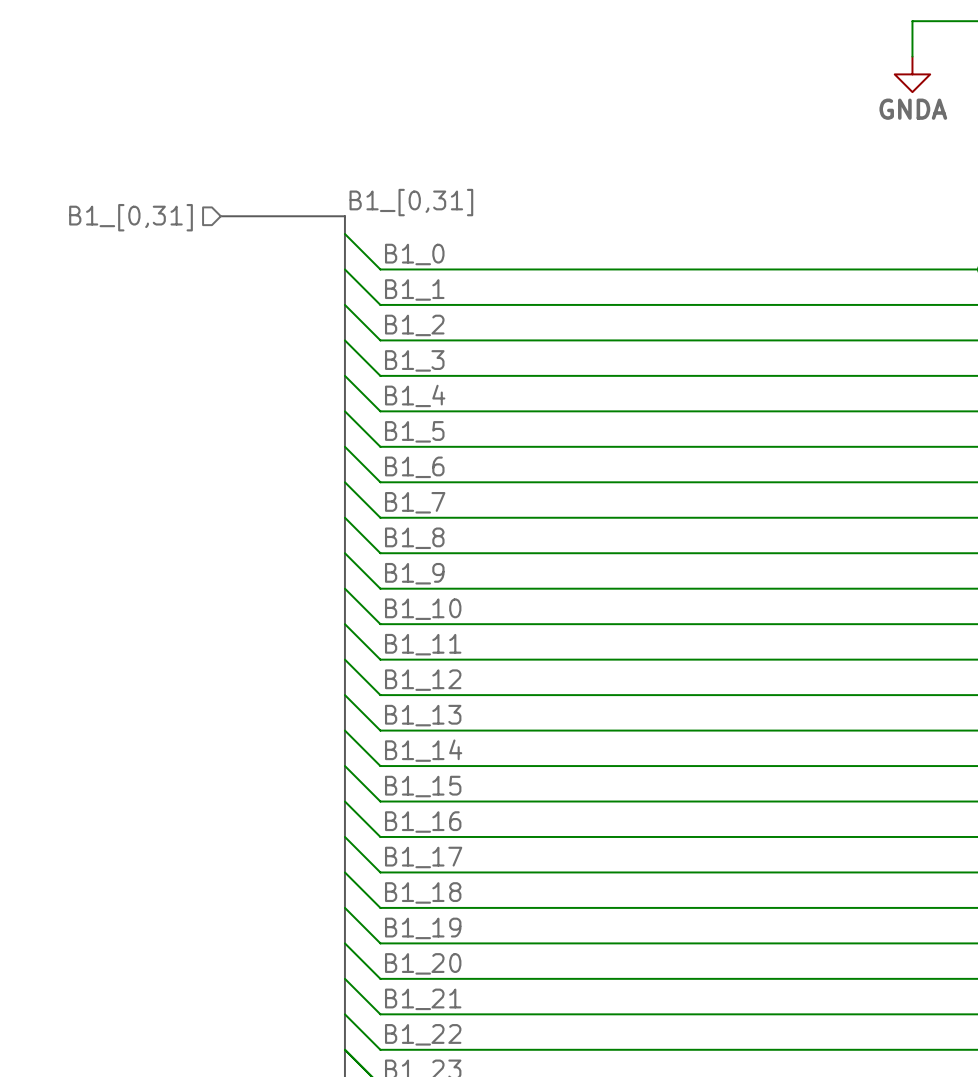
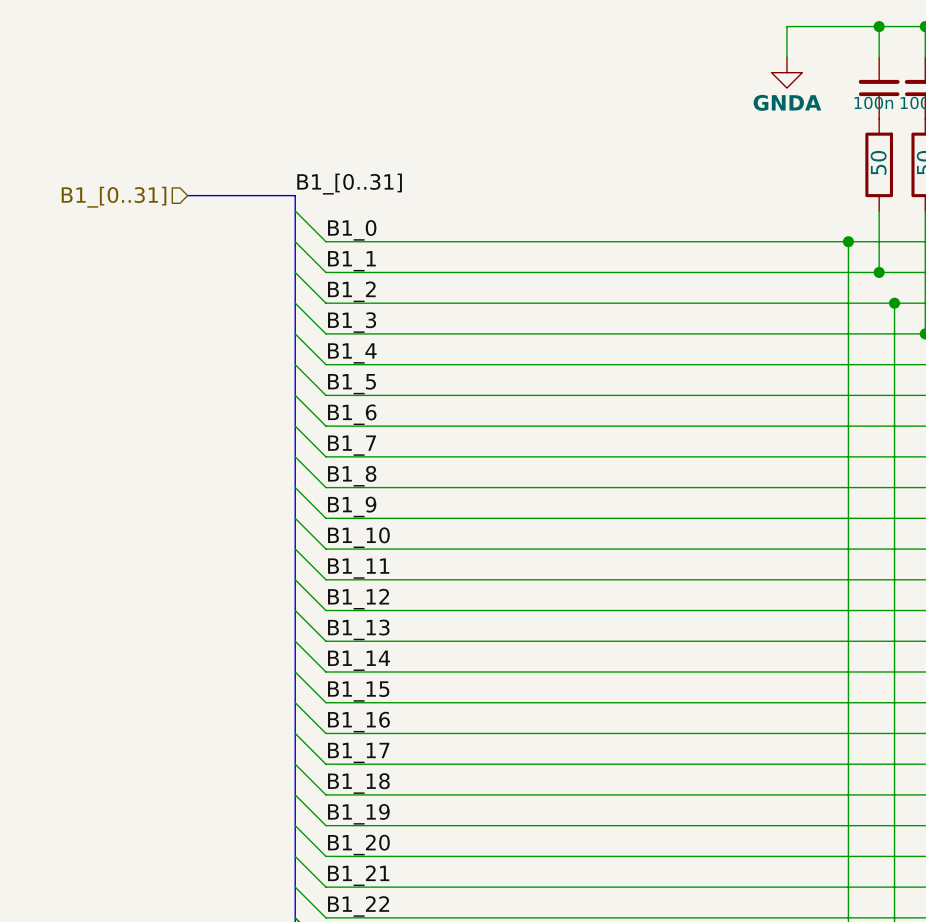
label: B1_[0,31] (411, 202) -> B1_[0..31] (349, 184)
hierarchical label: B1_[0,31] (131, 217) -> B1_[0..31] (114, 197)

